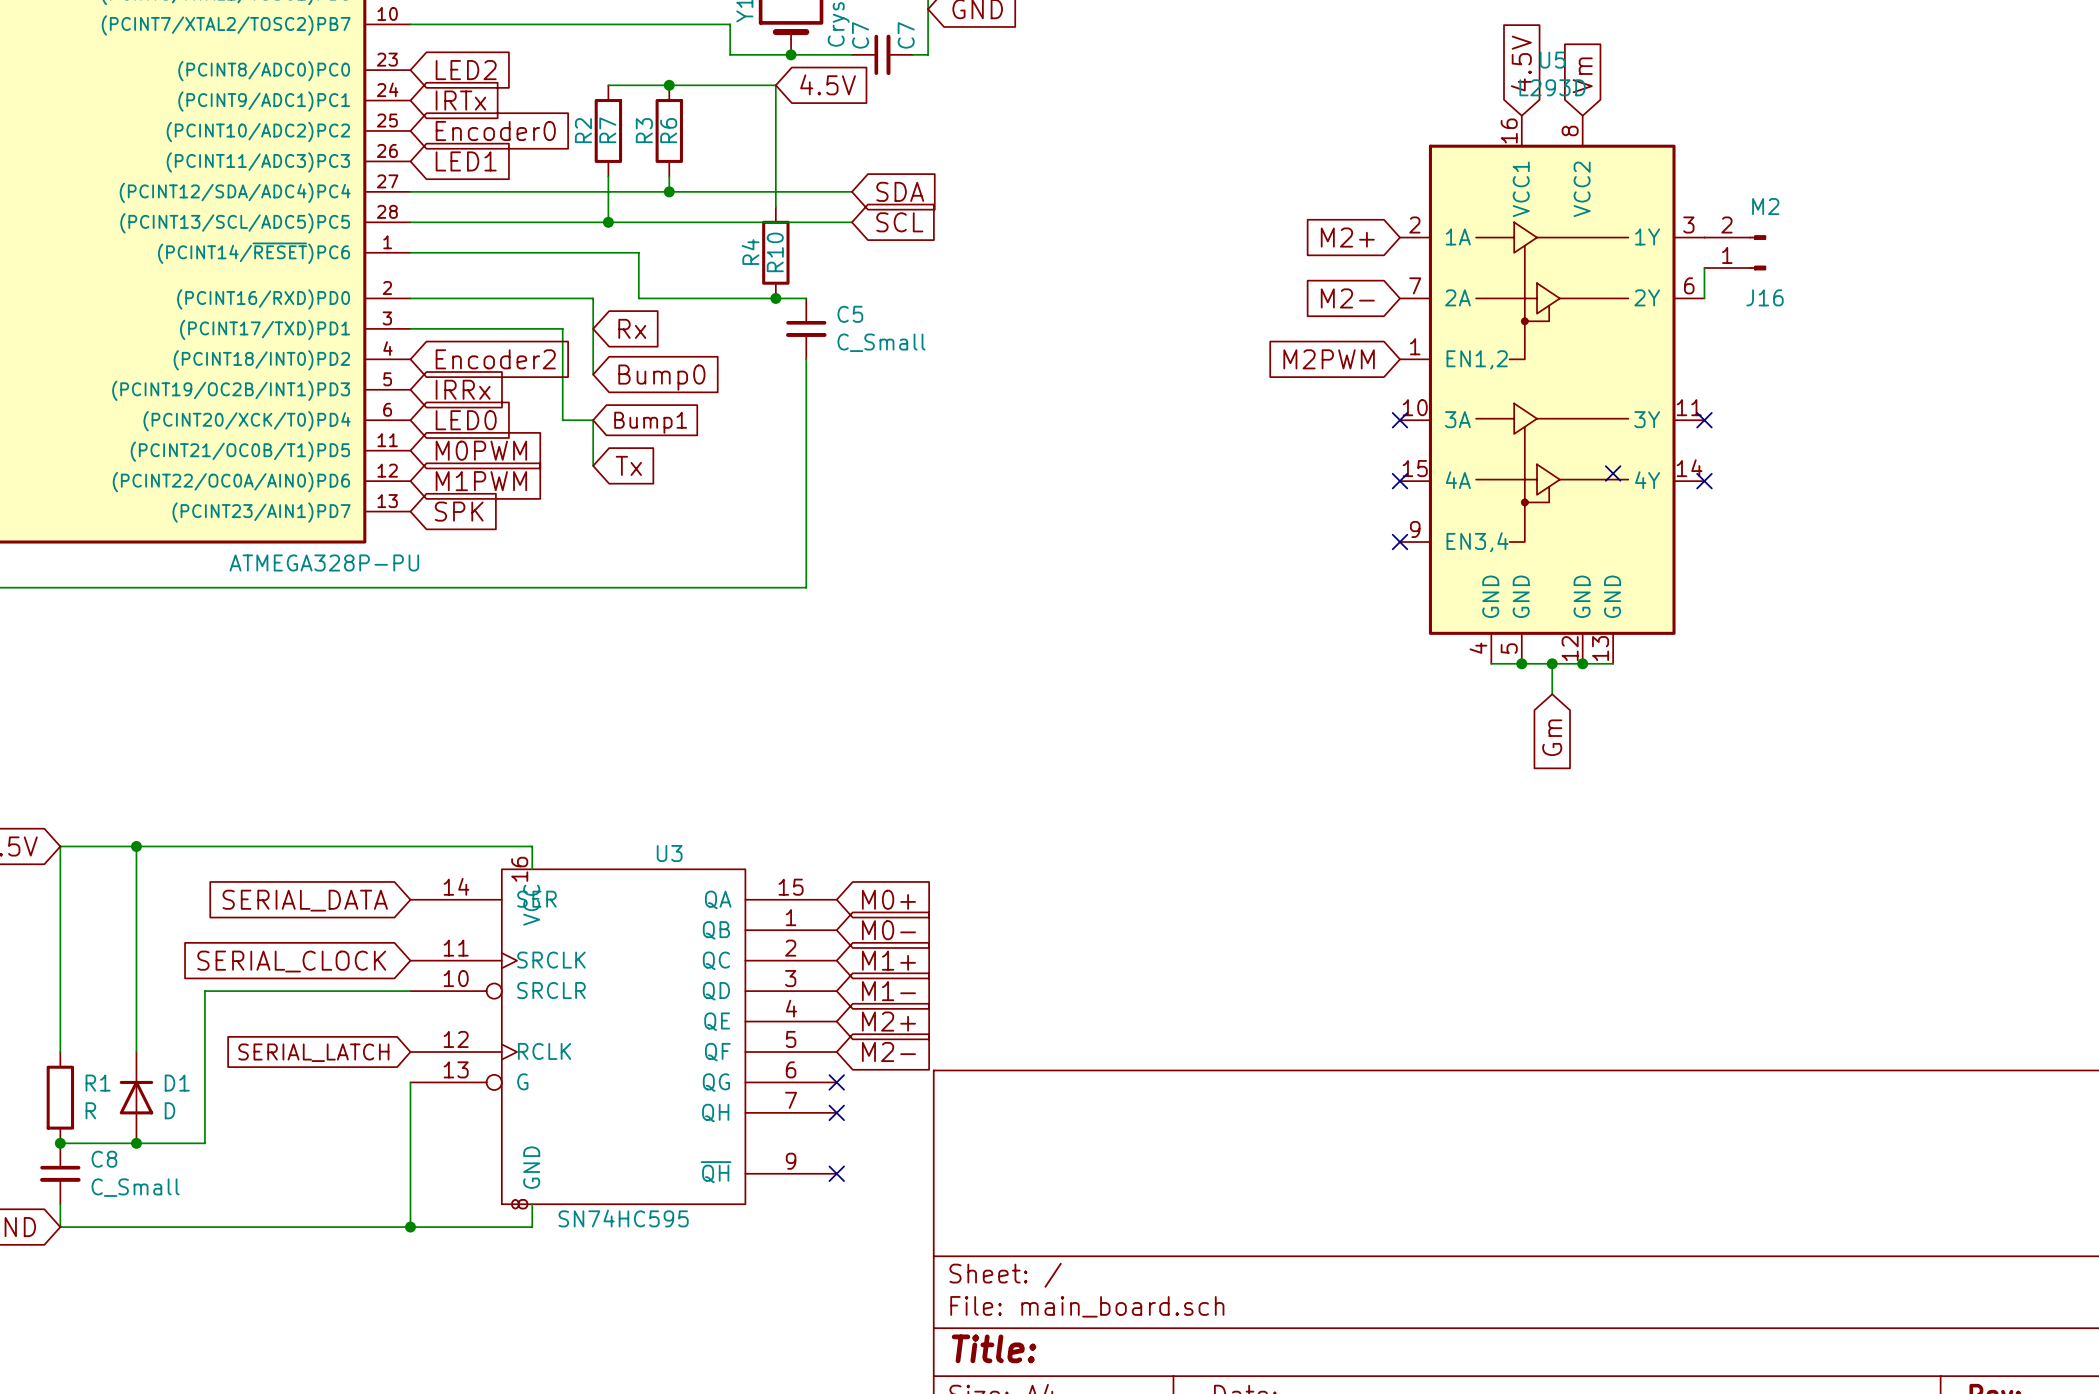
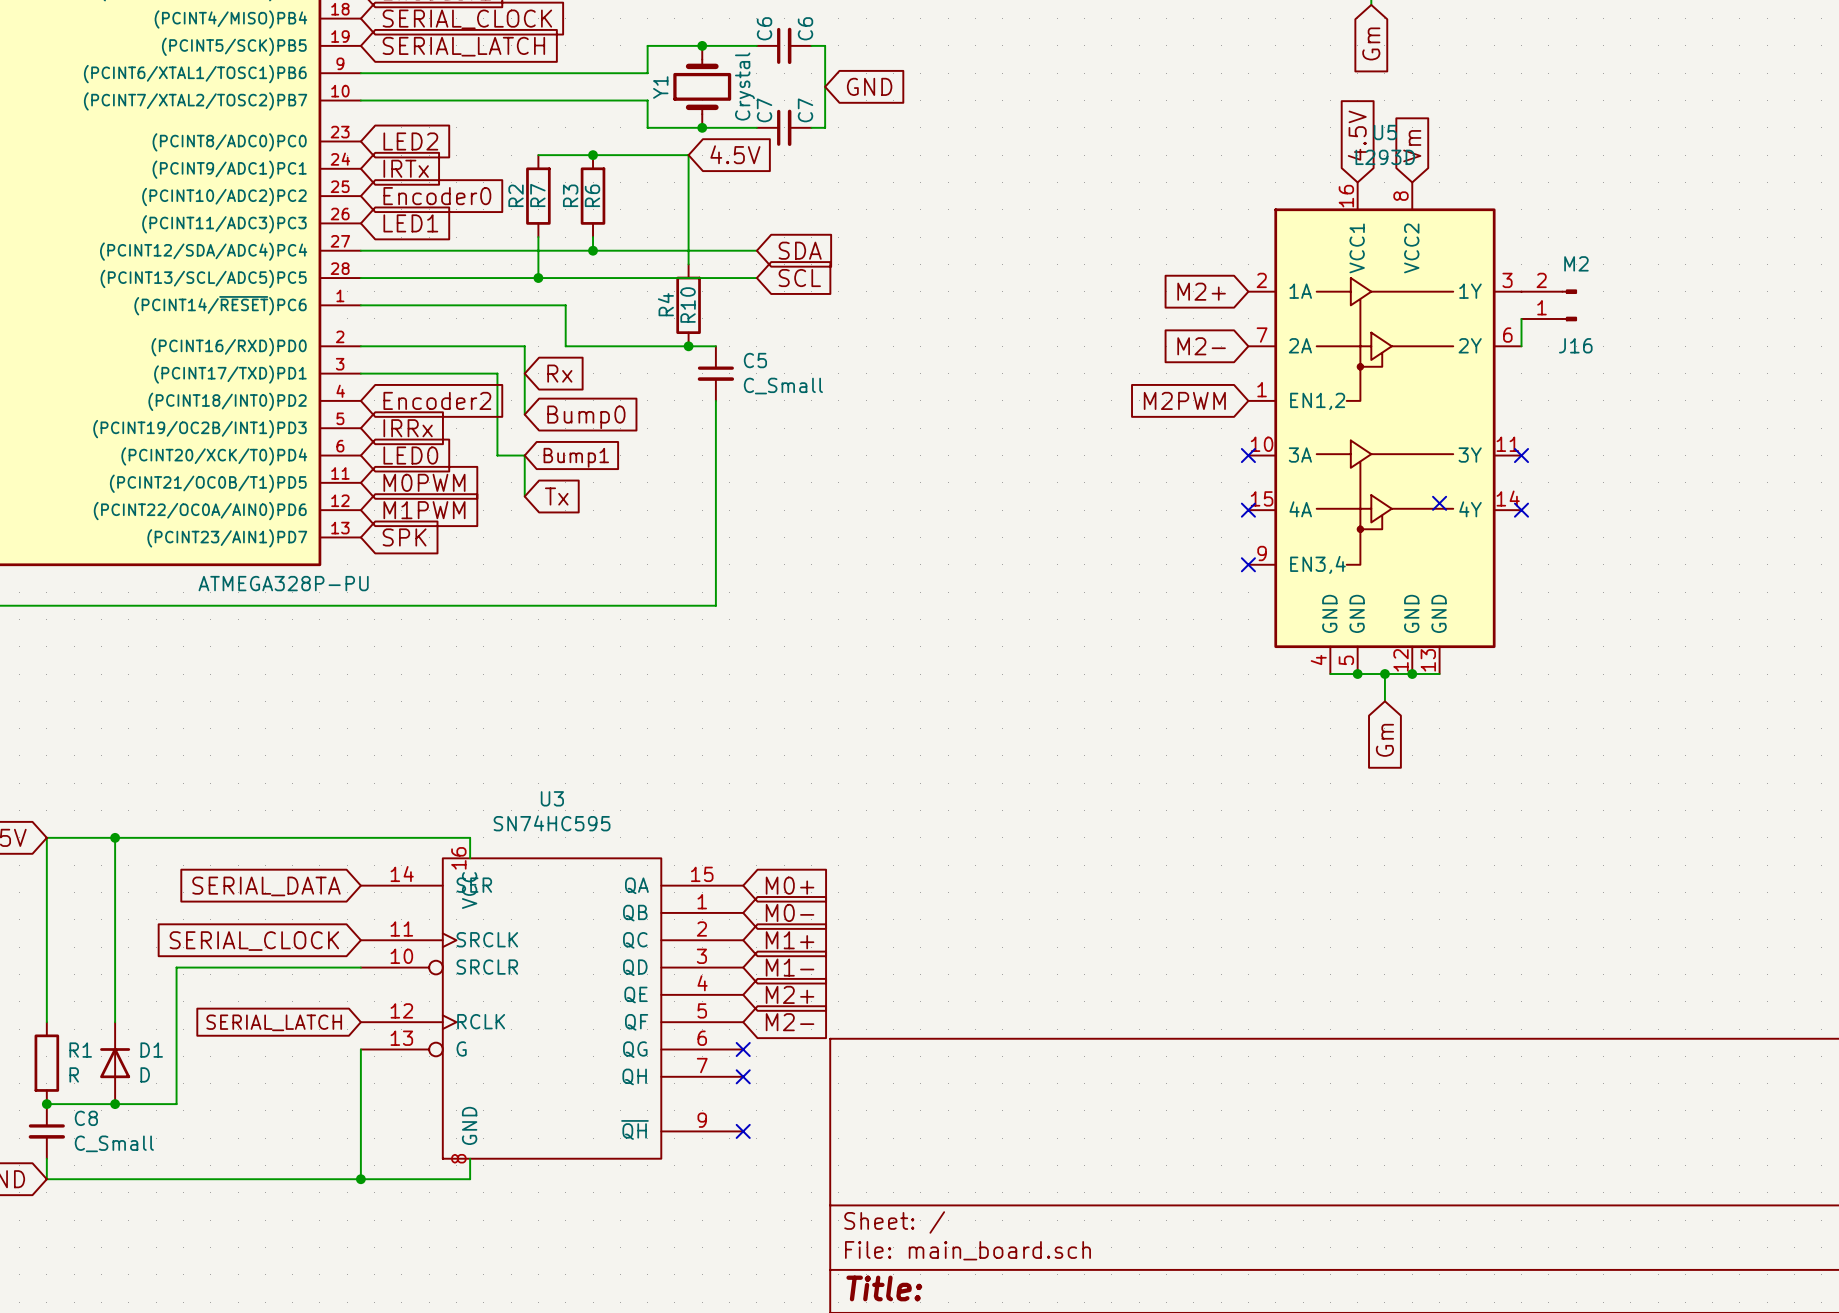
U3 name position: U3 (669, 853) -> U3 (552, 798)
U3 value position: SN74HC595 (623, 1218) -> SN74HC595 (552, 823)

